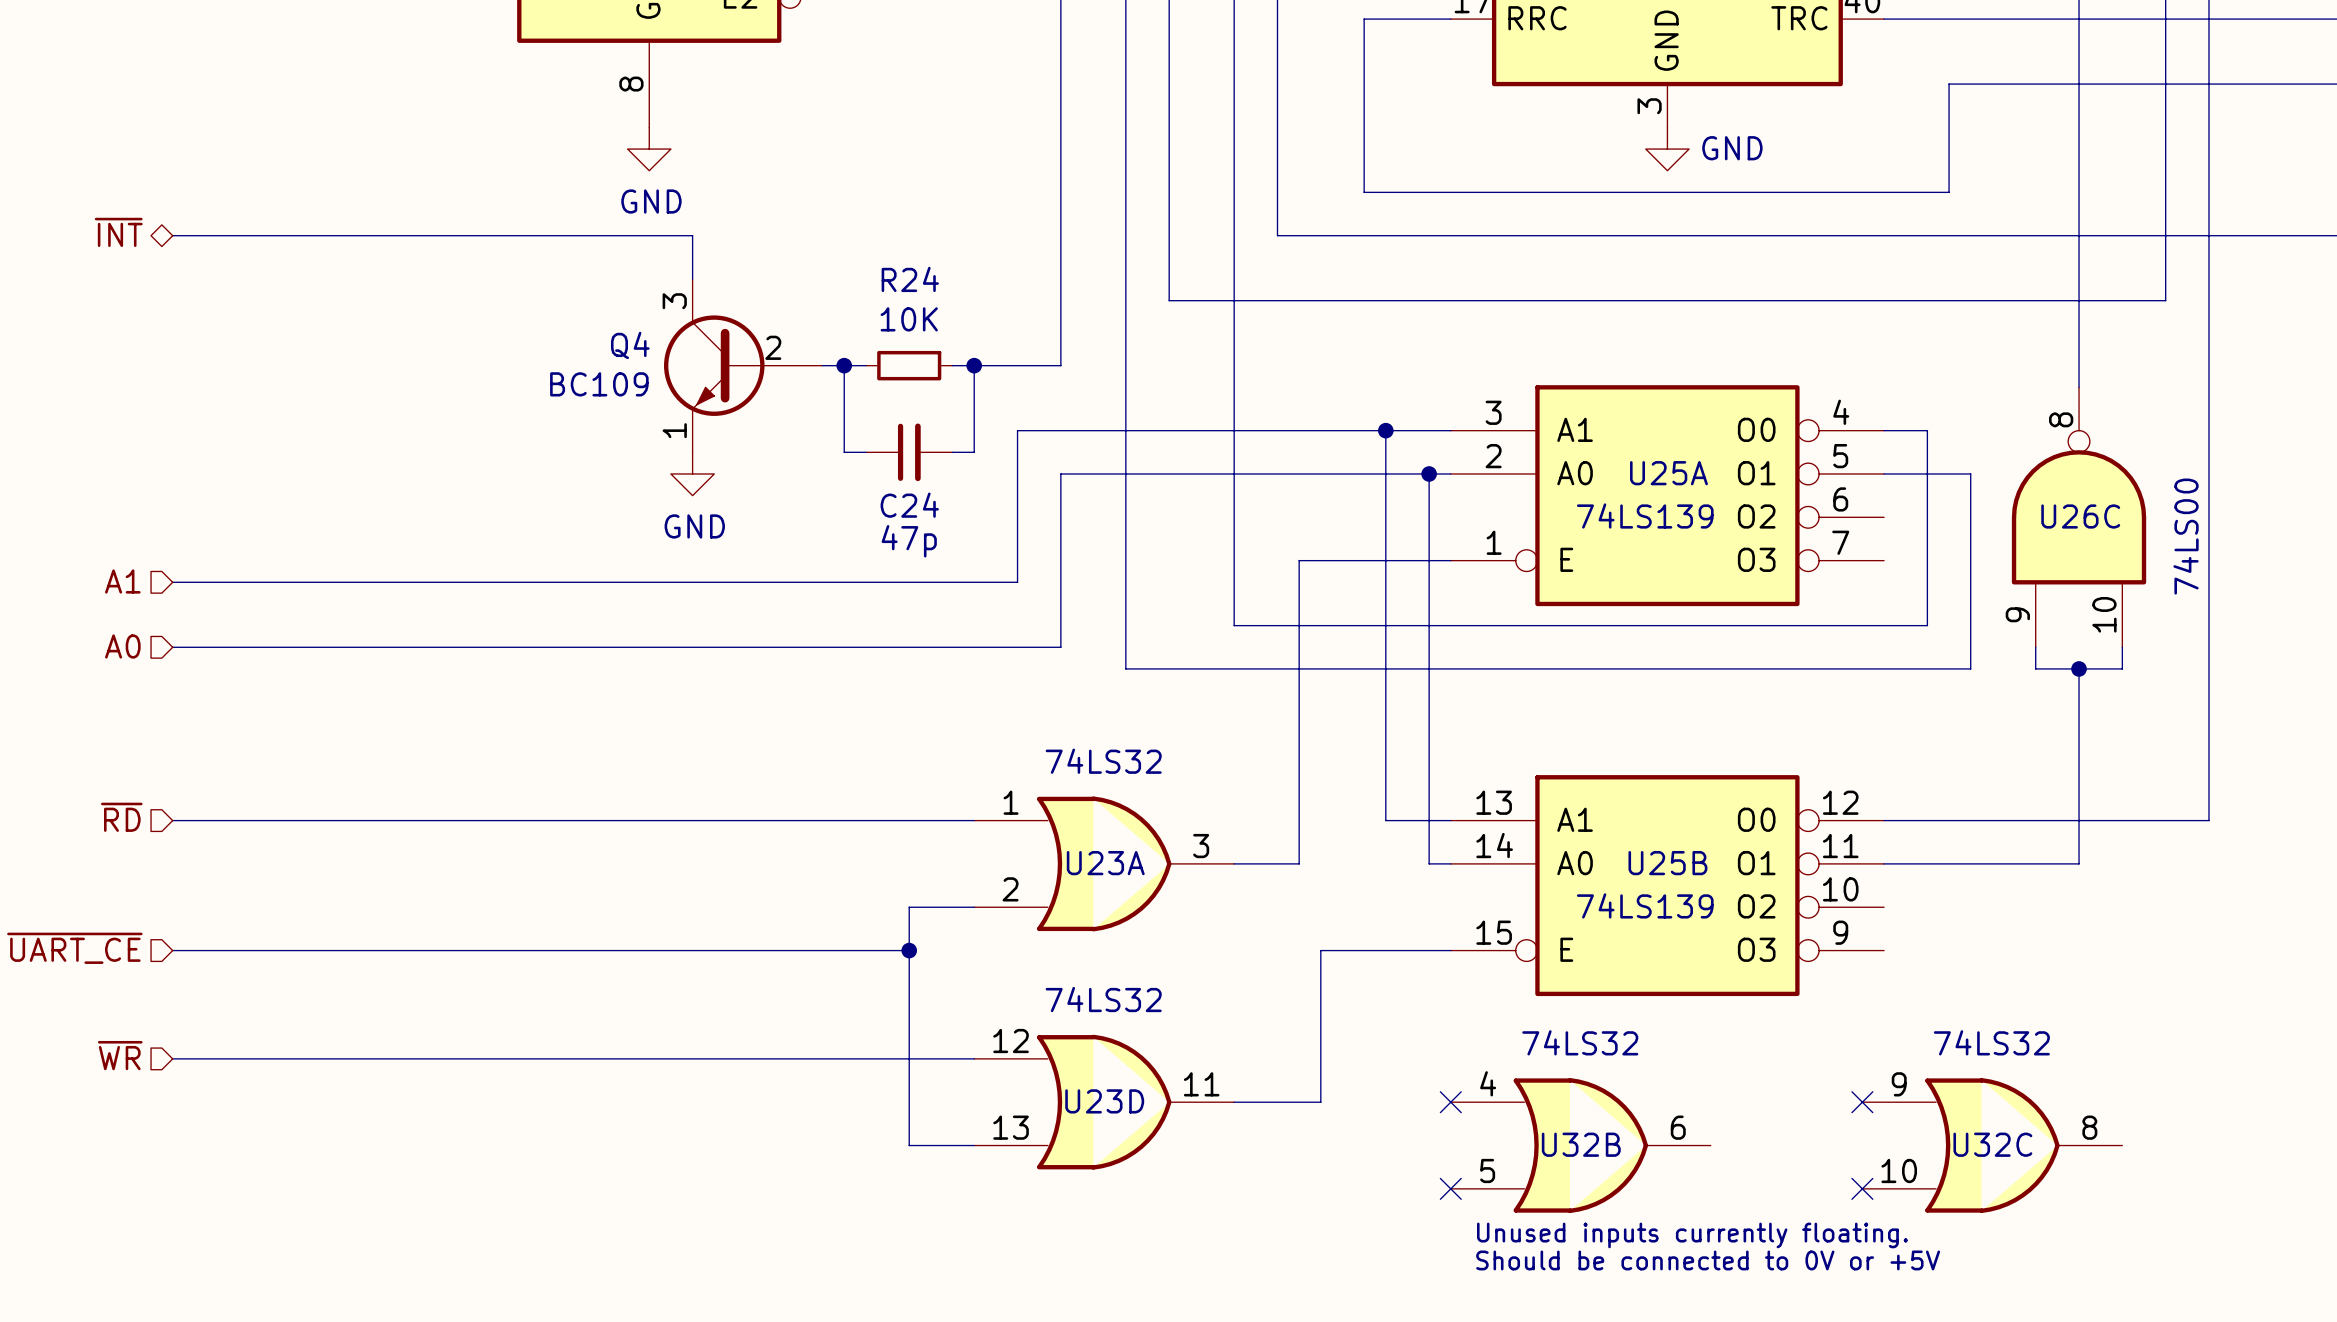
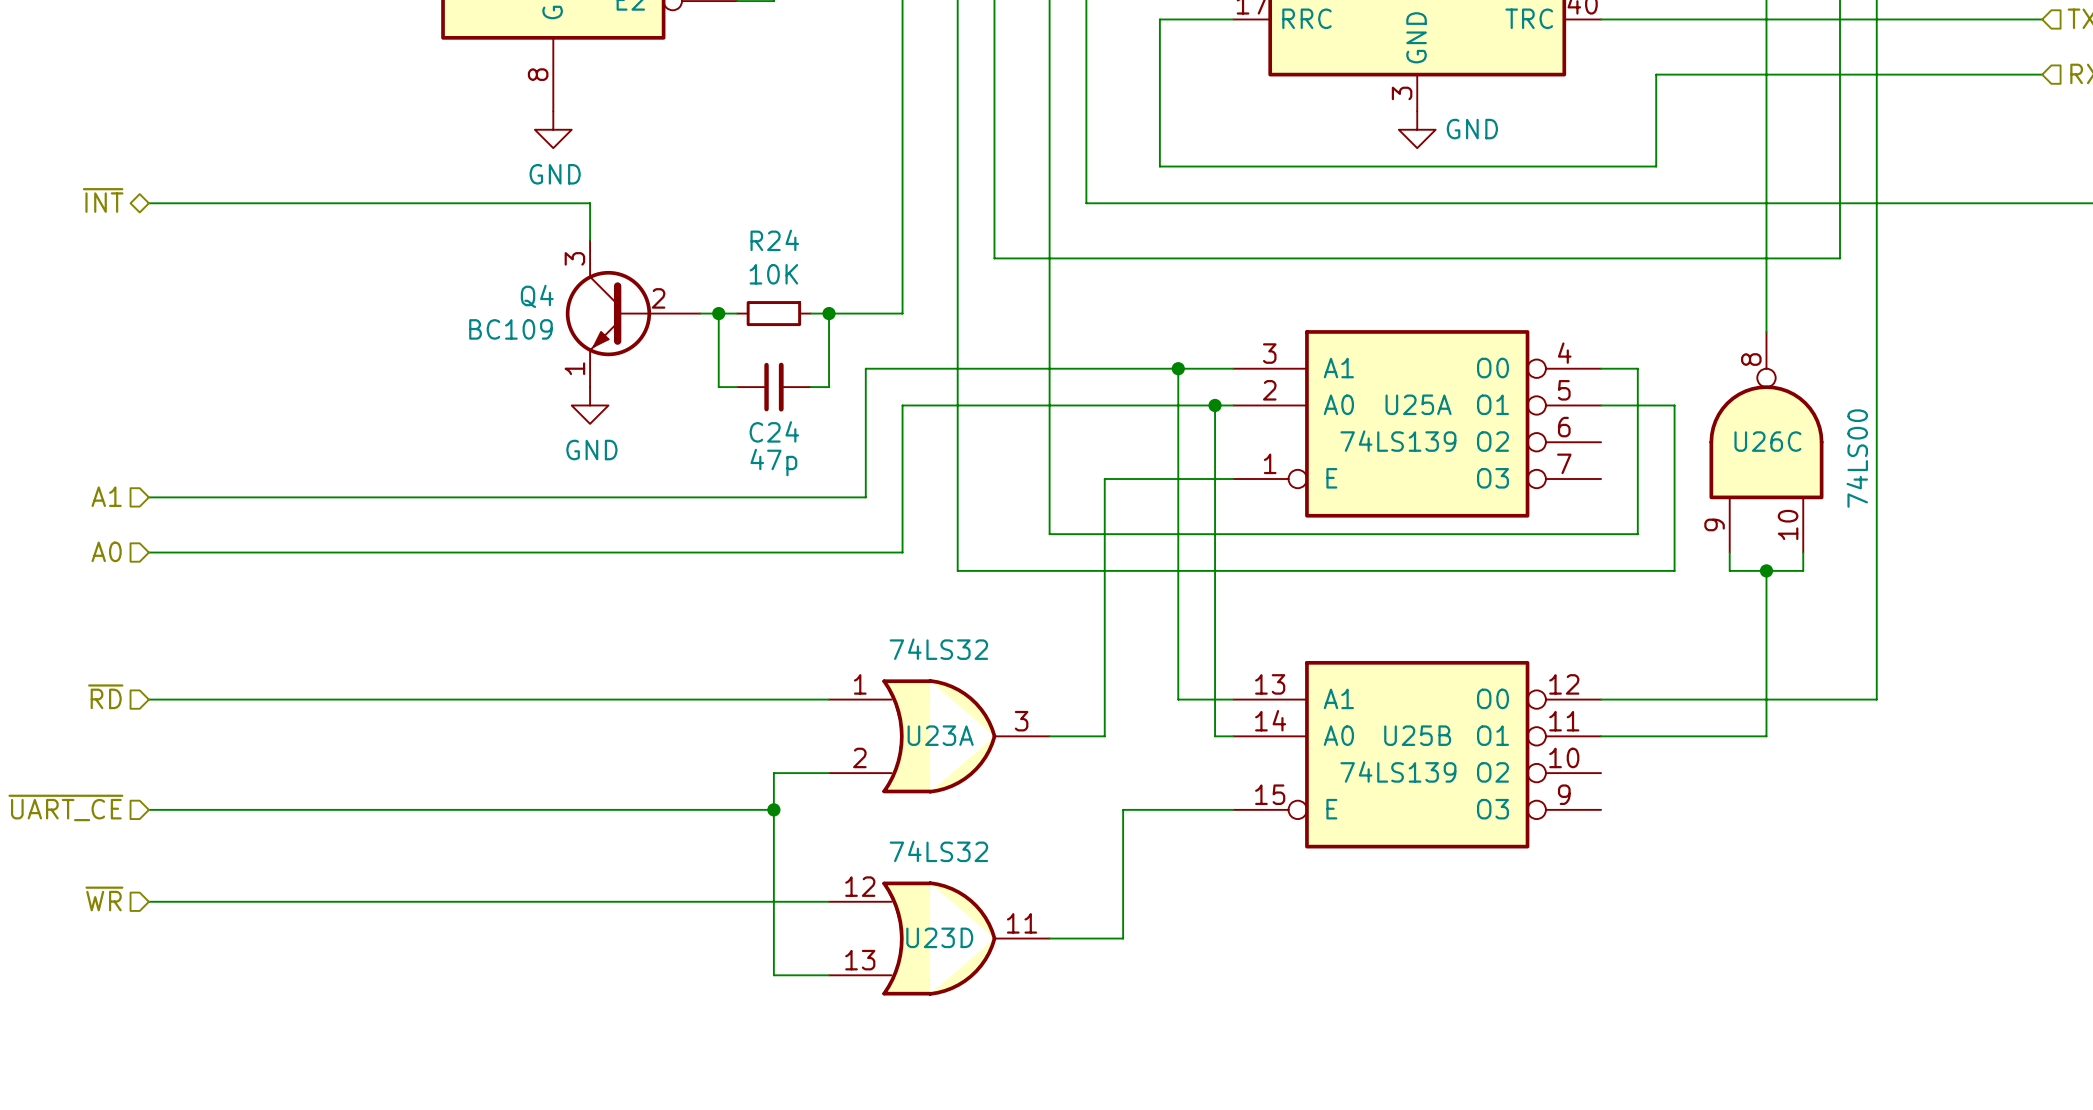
no-connect mark: (1450, 1102) -> none
no-connect mark: (1862, 1102) -> none
U32B: 74LS32 (1580, 1145) -> none
U32C: 74LS32 (1992, 1145) -> none
no-connect mark: (1450, 1188) -> none
no-connect mark: (1862, 1188) -> none
text: Unused inputs currently floating. (1692, 1235) -> none
text: Should be connected to 0V or +5V (1708, 1260) -> none

